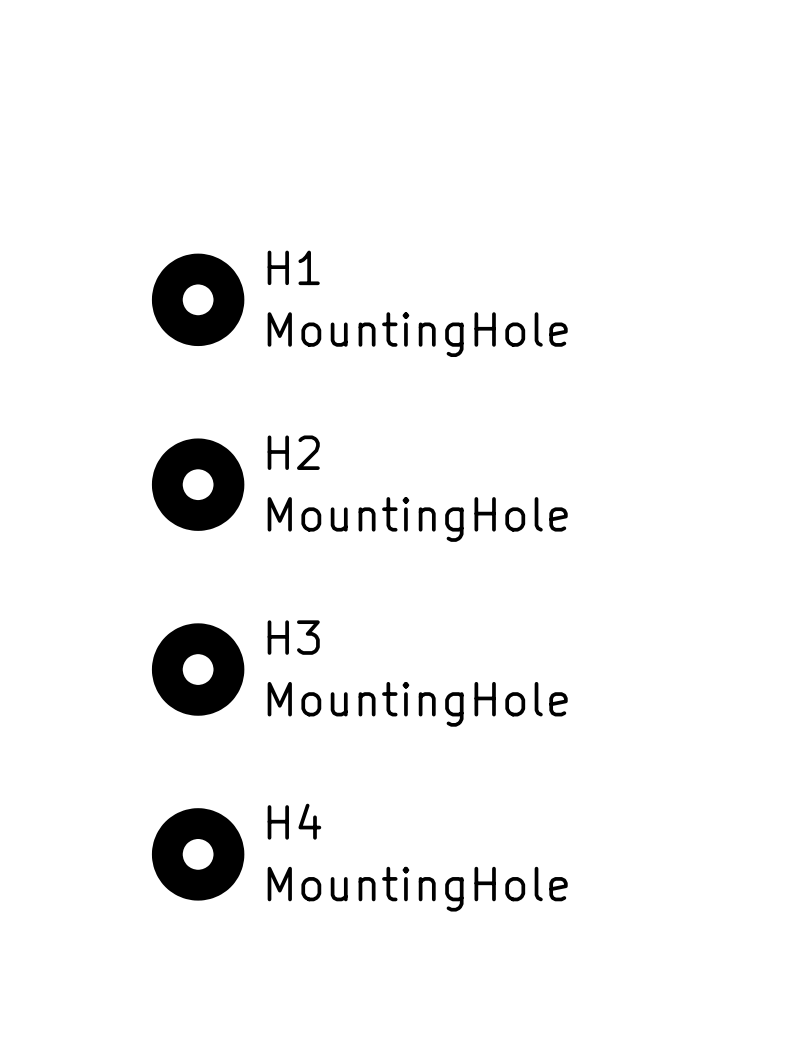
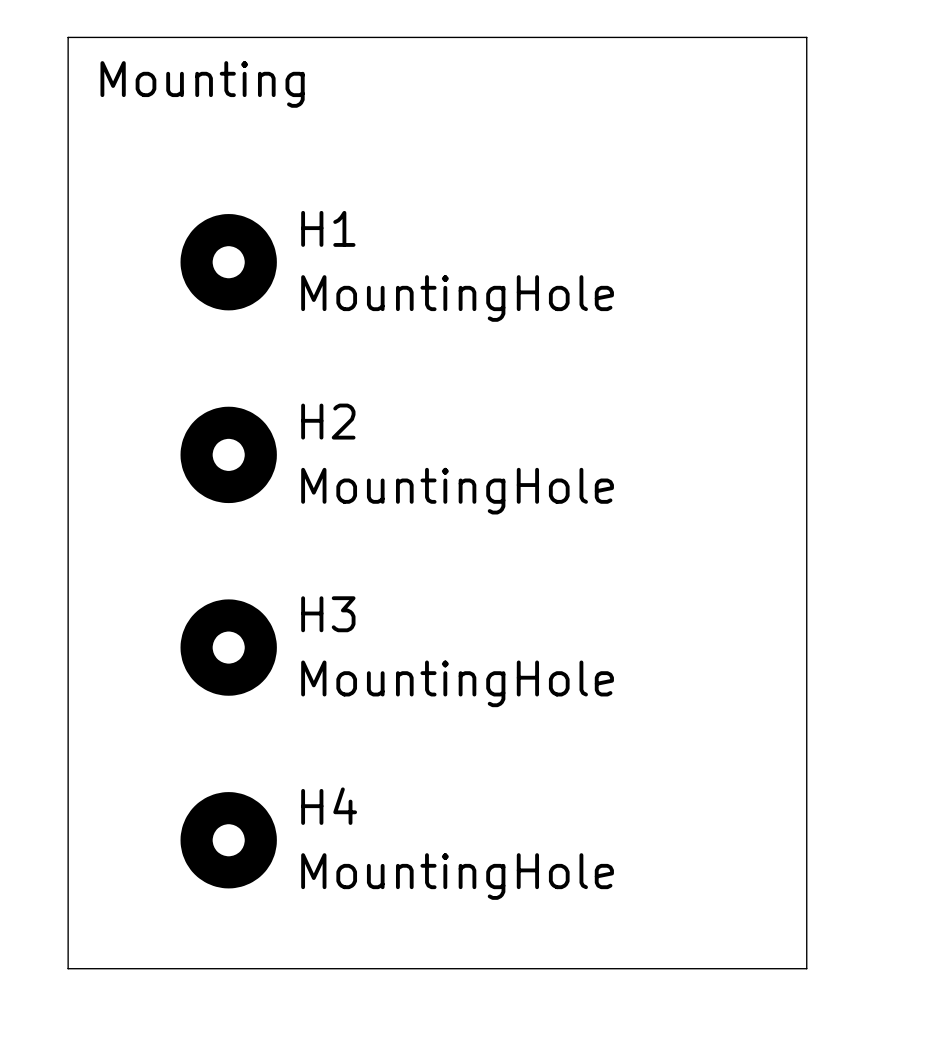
line: none -> (68, 37) (806, 37) (806, 968) (68, 968) (68, 37)
text: none -> Mounting (202, 84)

